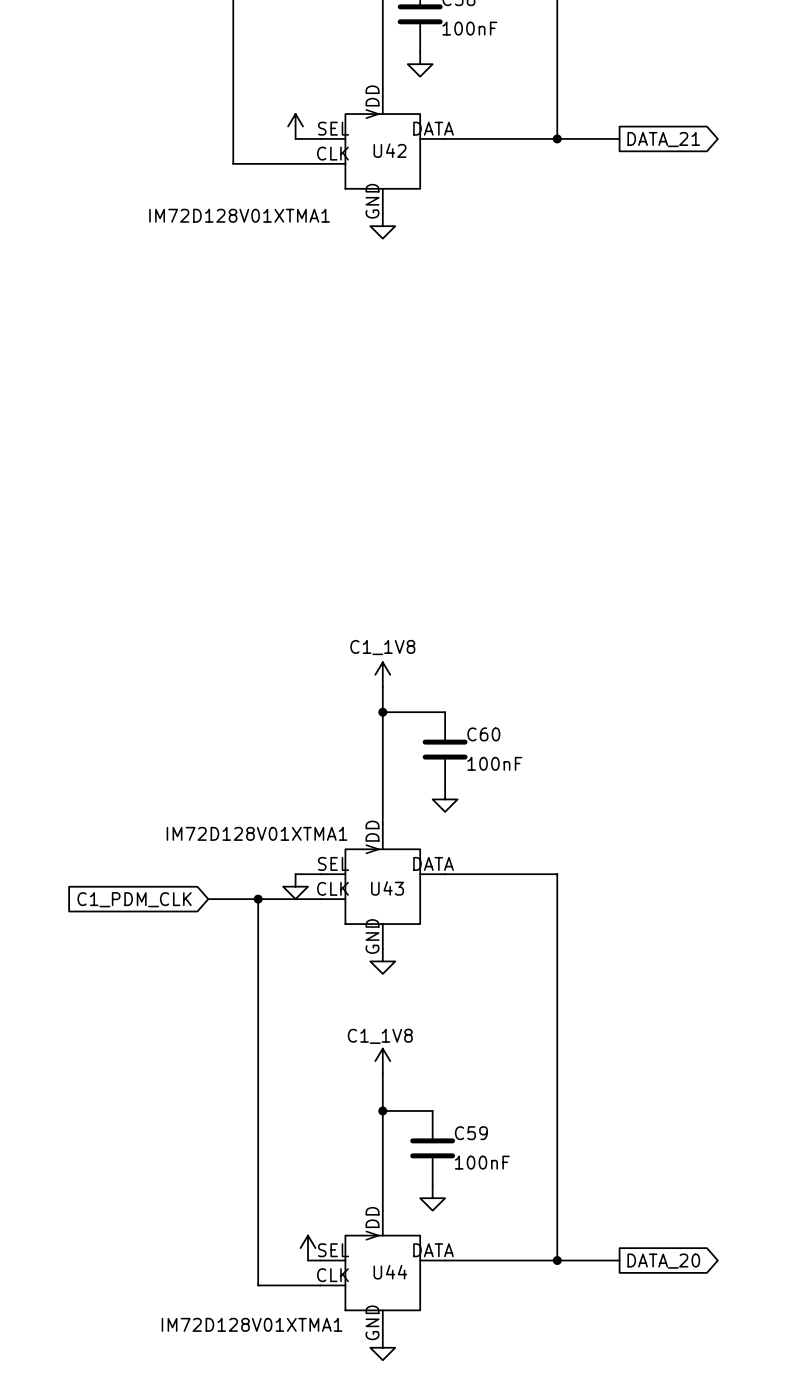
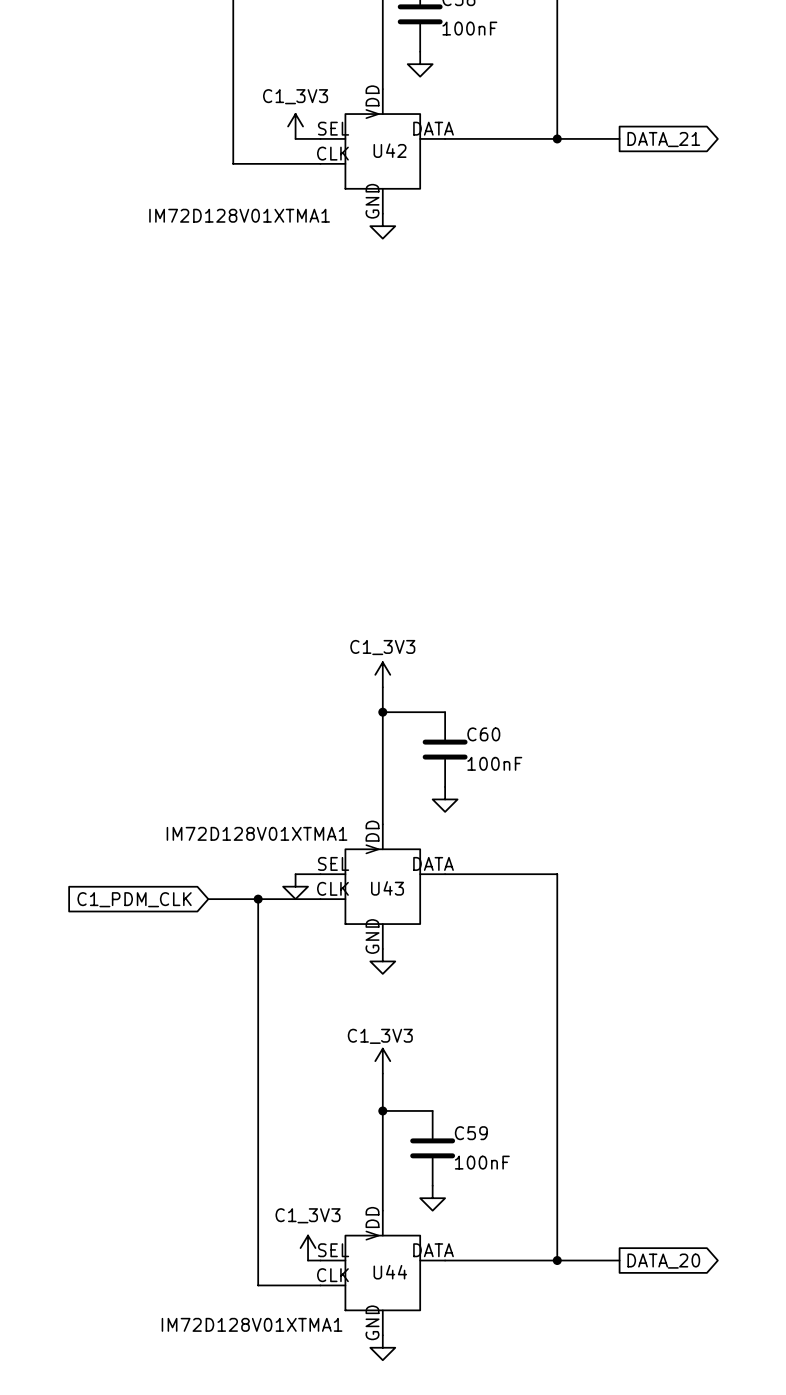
power symbol text: none -> C1_3V3 (295, 96)
power symbol: C1_1V8 (382, 674) -> C1_3V3 (382, 674)
power symbol: C1_1V8 (382, 1061) -> C1_3V3 (382, 1061)
power symbol text: none -> C1_3V3 (308, 1215)

